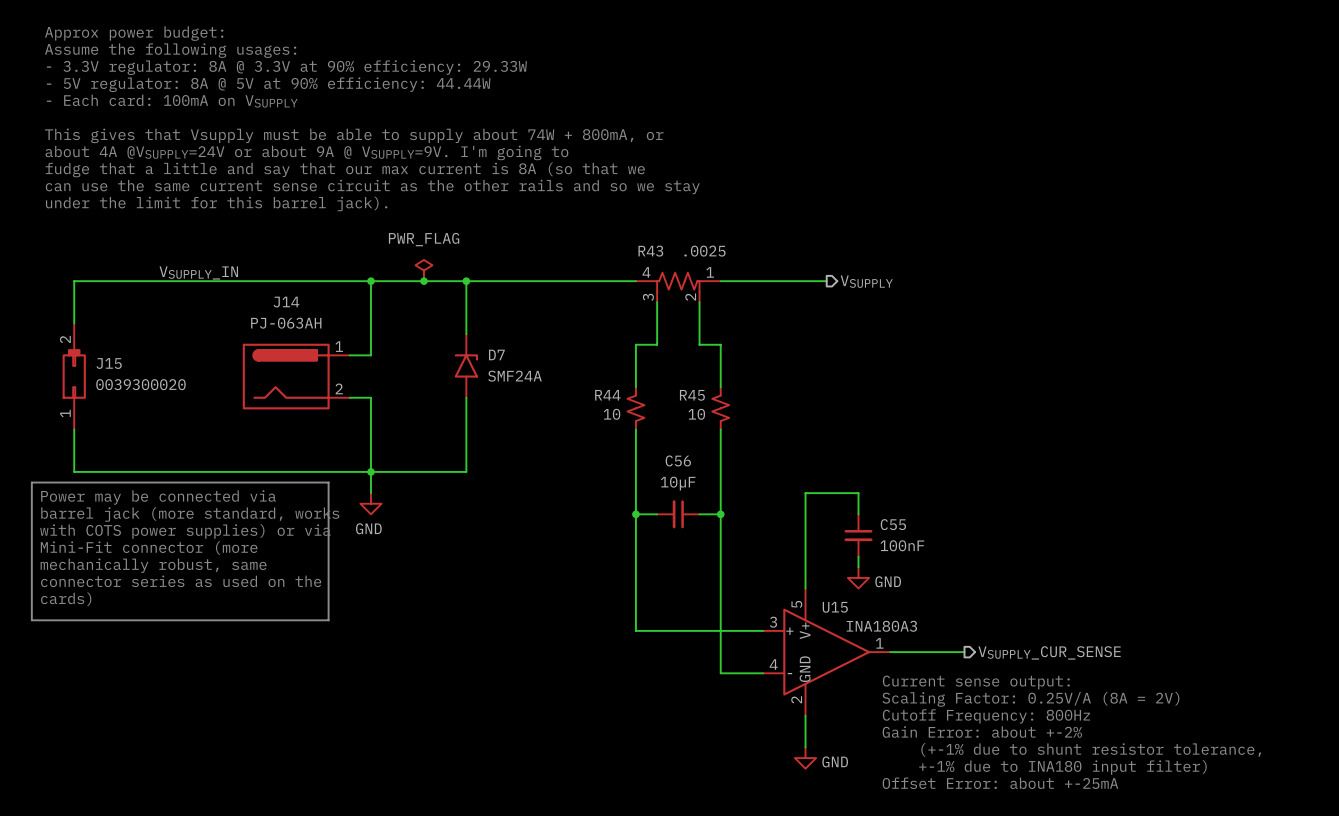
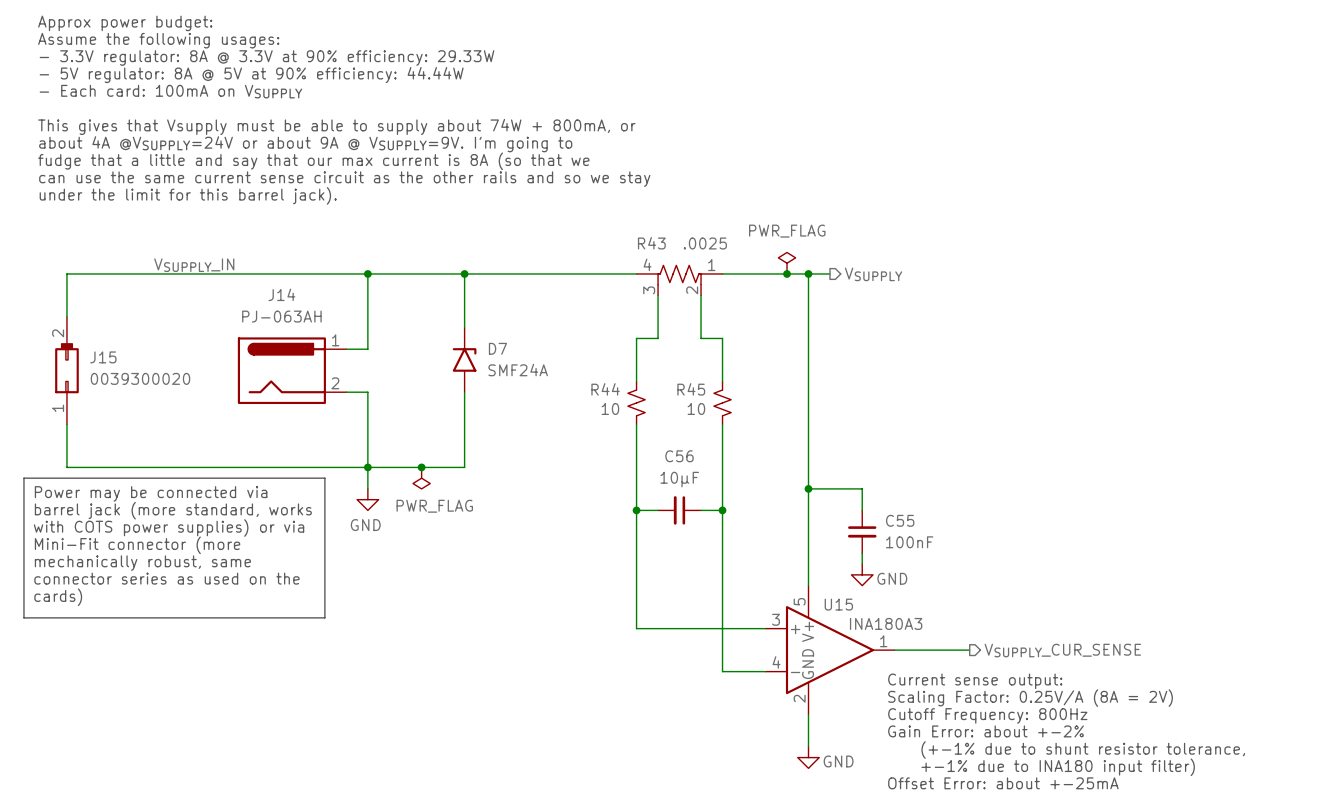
power symbol: PWR_FLAG (423, 270) -> none
power symbol: none -> PWR_FLAG (787, 263)
junction: (423, 281) -> none
junction: none -> (787, 273)
wire: none -> (808, 273) (808, 488)
junction: none -> (808, 273)
junction: none -> (421, 467)
power symbol: none -> PWR_FLAG (421, 478)
junction: none -> (808, 488)

